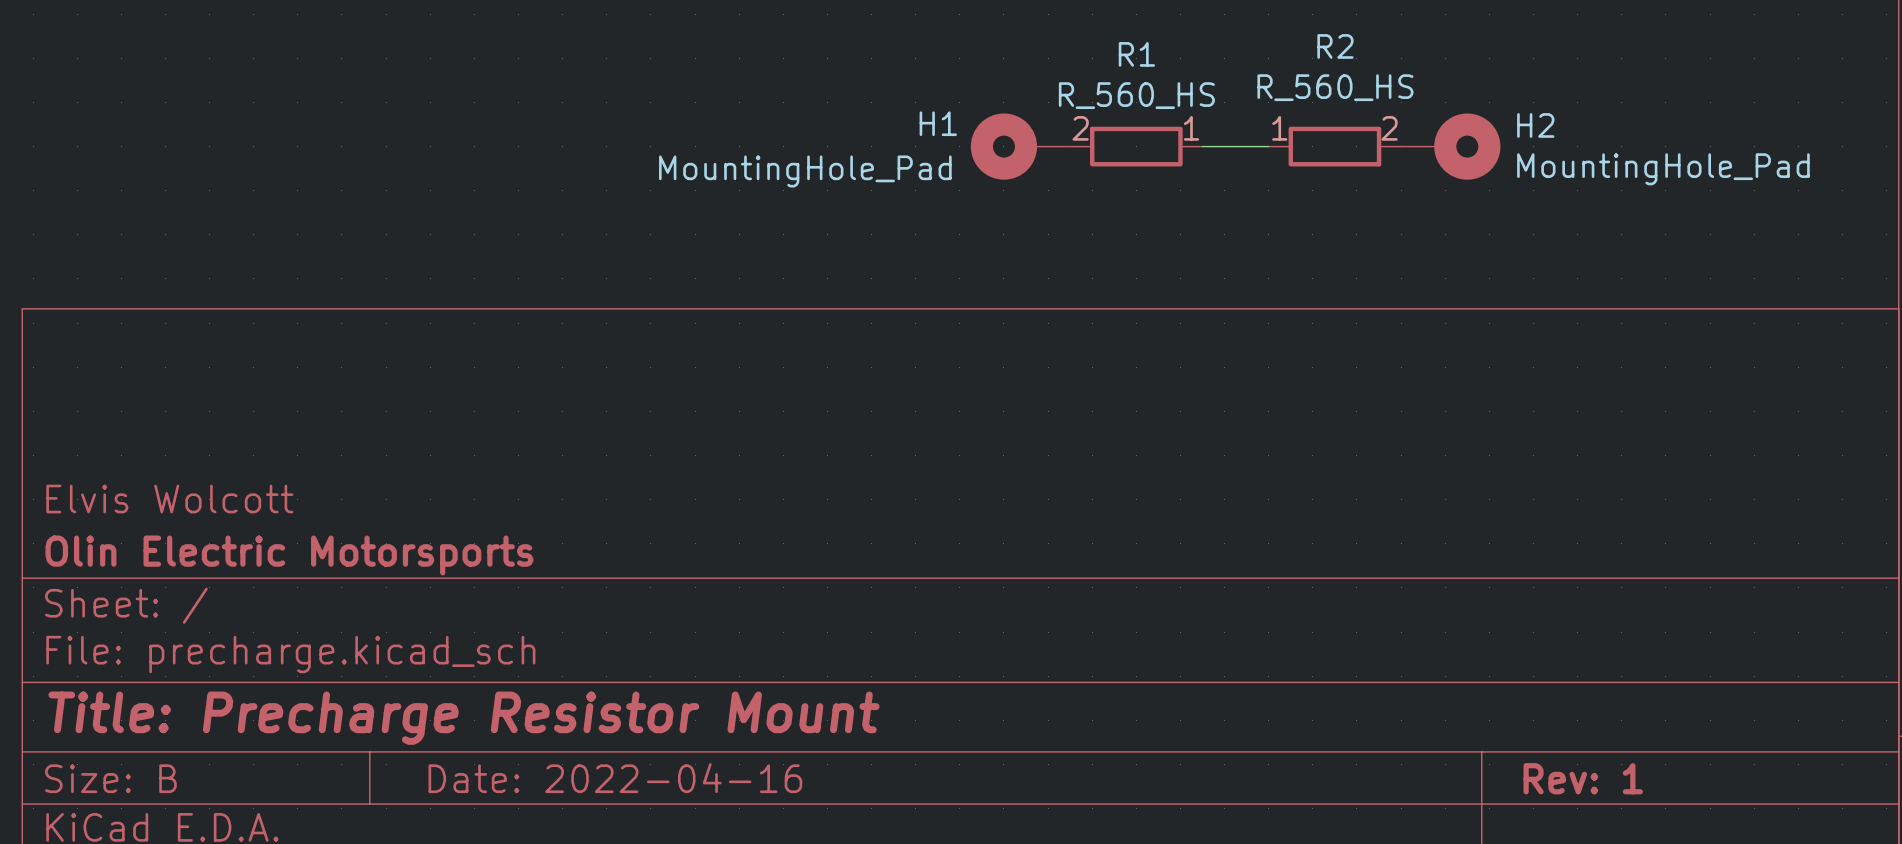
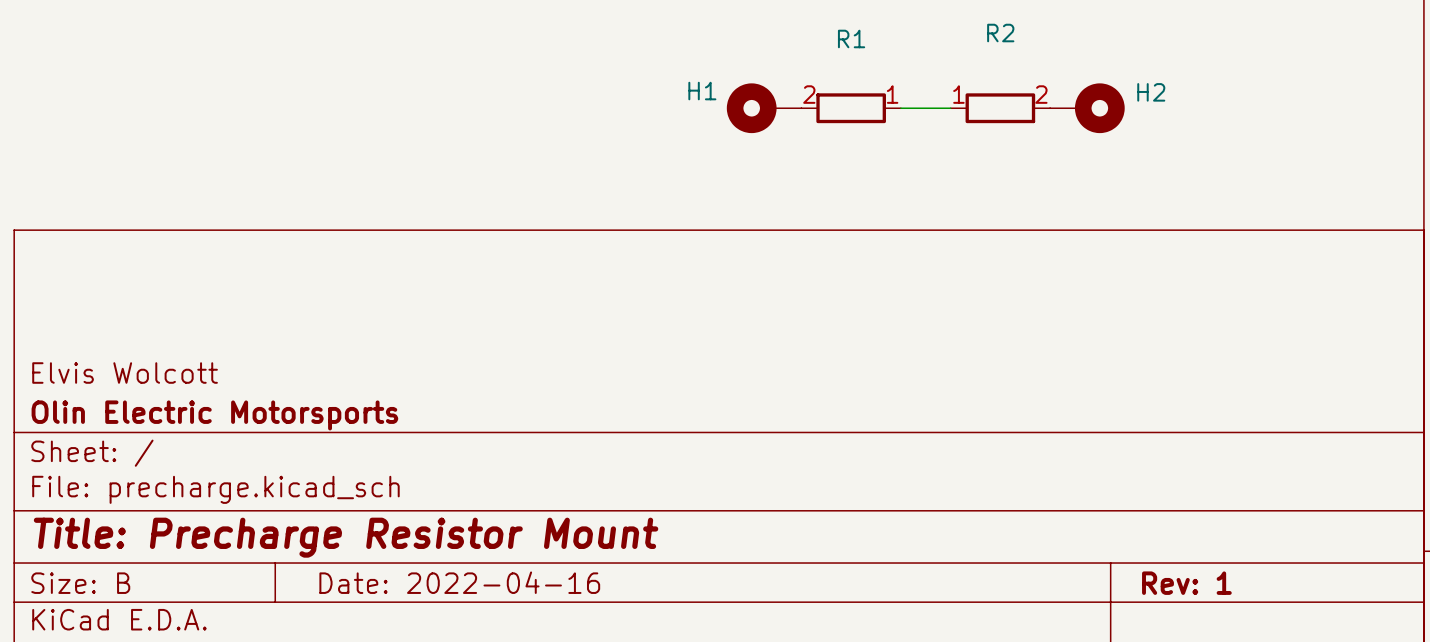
R2 value: R_560_HS (1335, 87) -> none
R1 value: R_560_HS (1136, 95) -> none
H2 value: MountingHole_Pad (1663, 169) -> none
H1 value: MountingHole_Pad (805, 171) -> none

